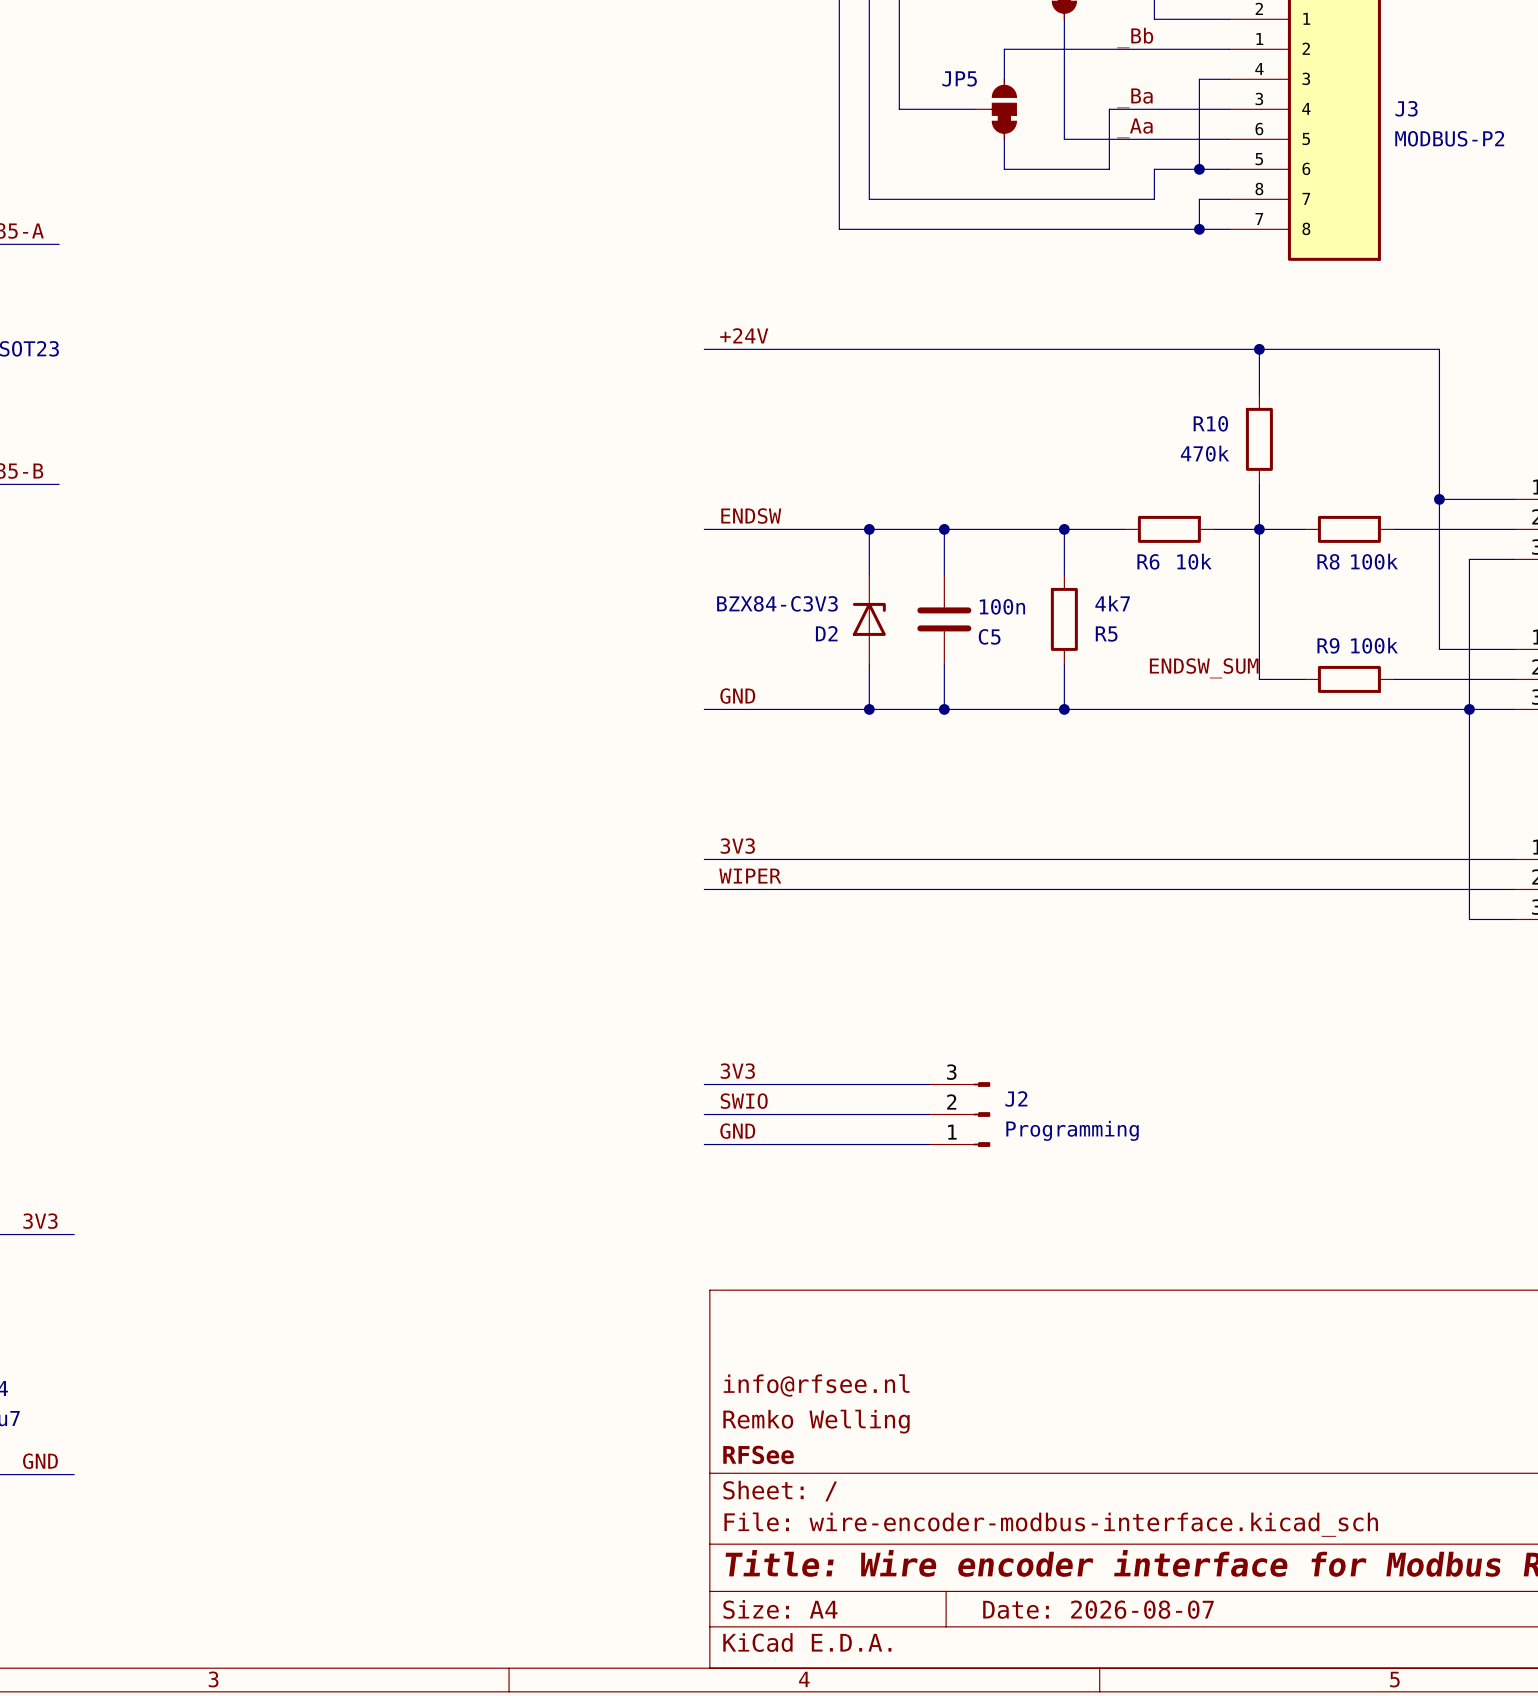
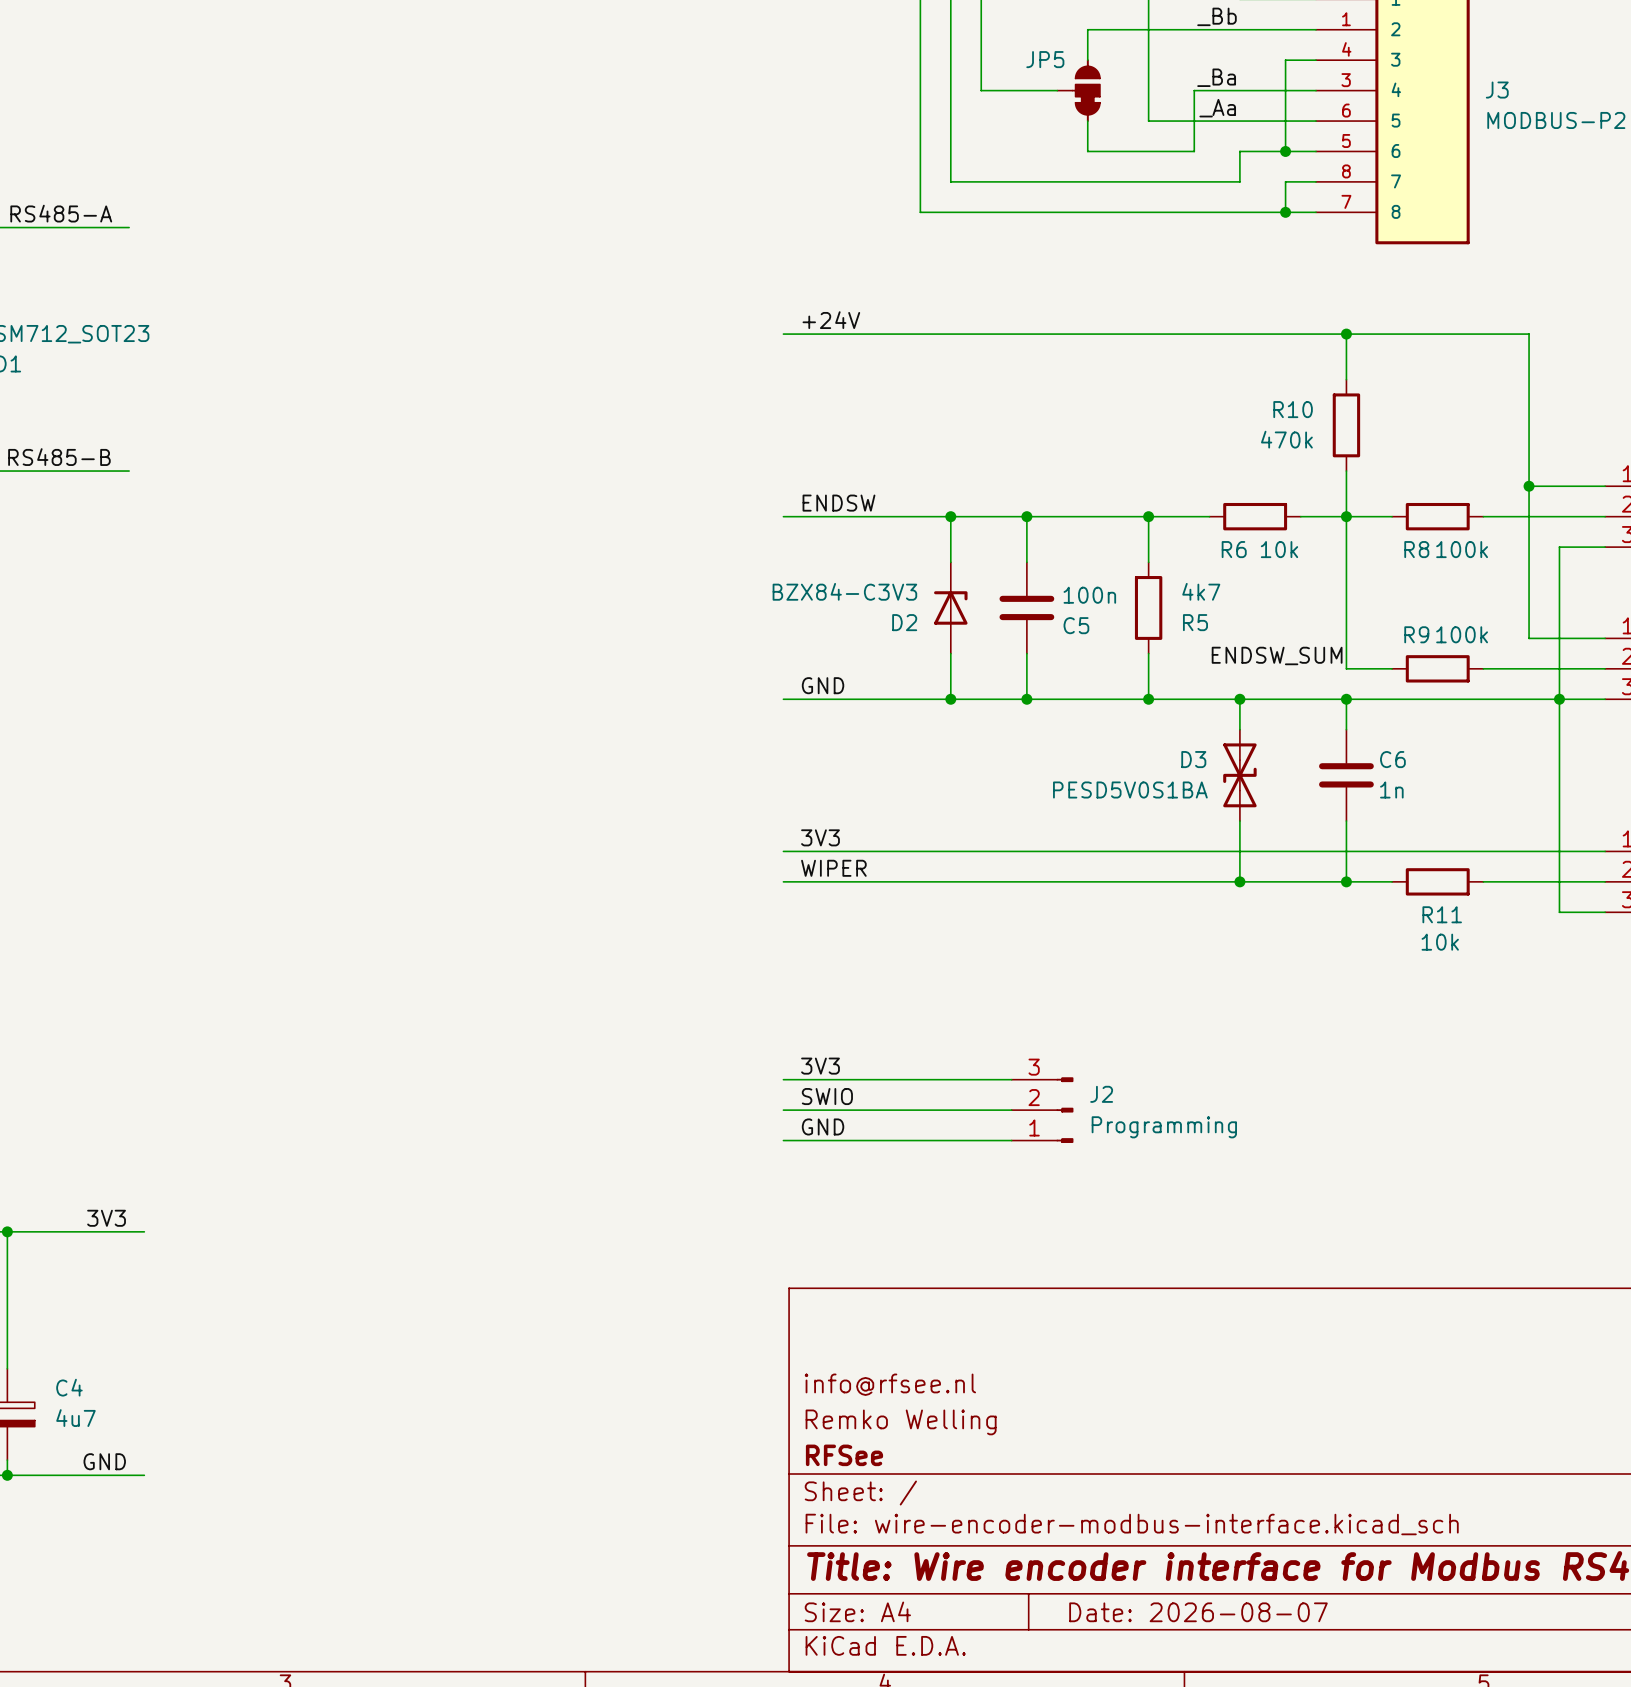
wire: none -> (1239, 699) (1239, 729)
junction: none -> (1239, 699)
wire: none -> (1346, 699) (1346, 729)
junction: none -> (1346, 699)
D3: none -> PESD5V0S1BA (1239, 775)
C6: none -> 1n (1346, 775)
wire: none -> (1239, 821) (1239, 881)
wire: none -> (1346, 821) (1346, 881)
junction: none -> (1239, 881)
junction: none -> (1346, 881)
wire: (1304, 889) (1394, 889) -> none
R11: none -> 10k (1437, 881)

